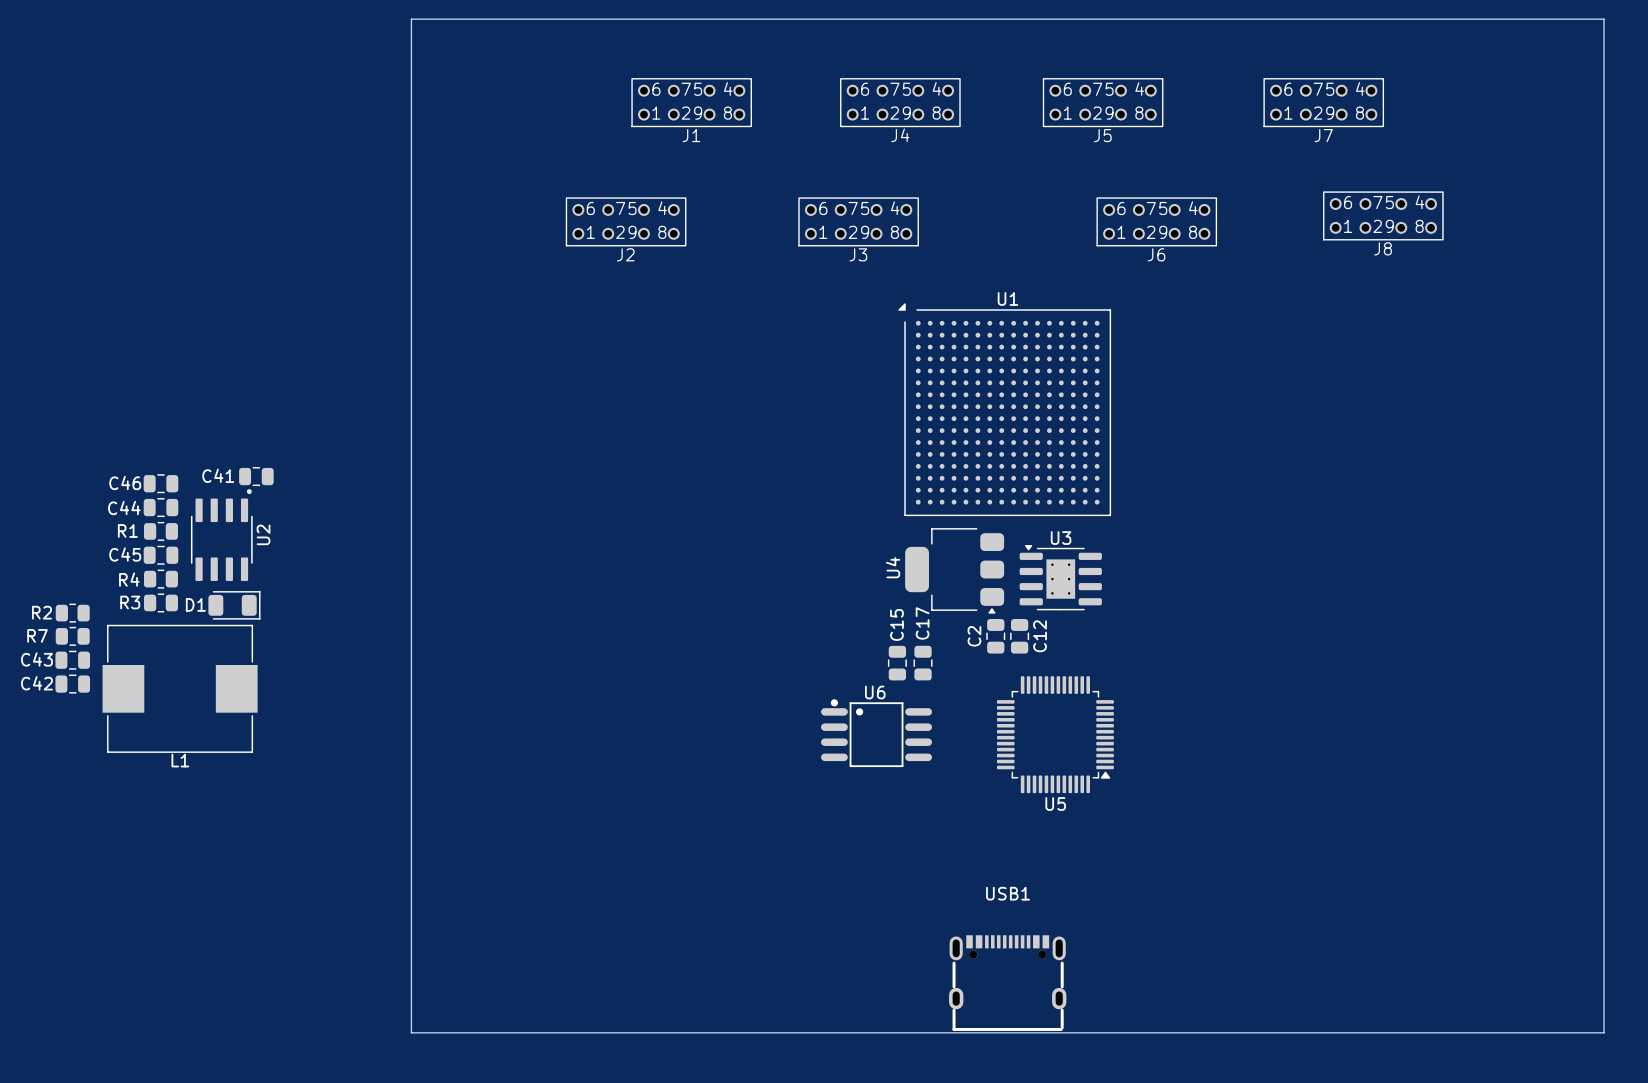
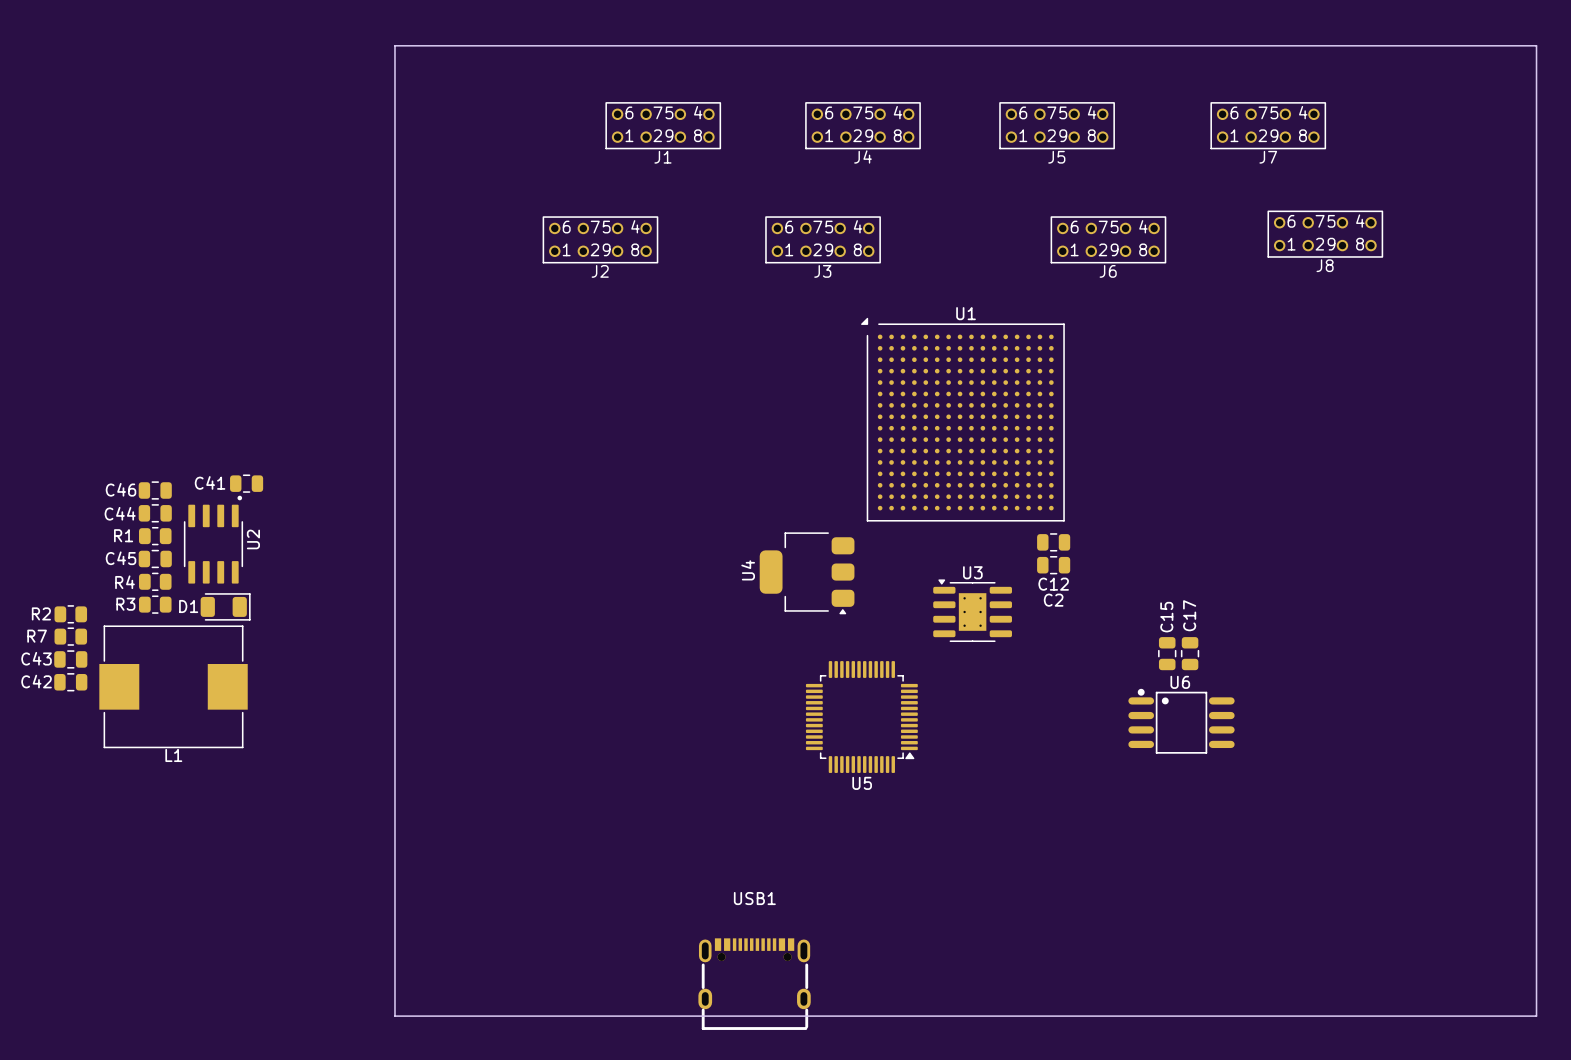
U4 position: (954, 570) -> (807, 573)
U3 position: (1060, 577) -> (972, 610)
C2 name position: C2 (974, 636) -> C2 (1053, 600)
C2 rotation: 0° (995, 636) -> 90° clockwise (1053, 565)
C2 position: (995, 636) -> (1053, 565)
C12 rotation: 0° (1019, 636) -> 90° clockwise (1053, 542)
C12 position: (1019, 636) -> (1053, 542)
C15 position: (897, 663) -> (1167, 653)
C17 position: (923, 663) -> (1190, 653)
U6 position: (876, 733) -> (1181, 721)
U5 position: (1055, 734) -> (861, 717)
USB1 position: (1007, 983) -> (754, 984)

